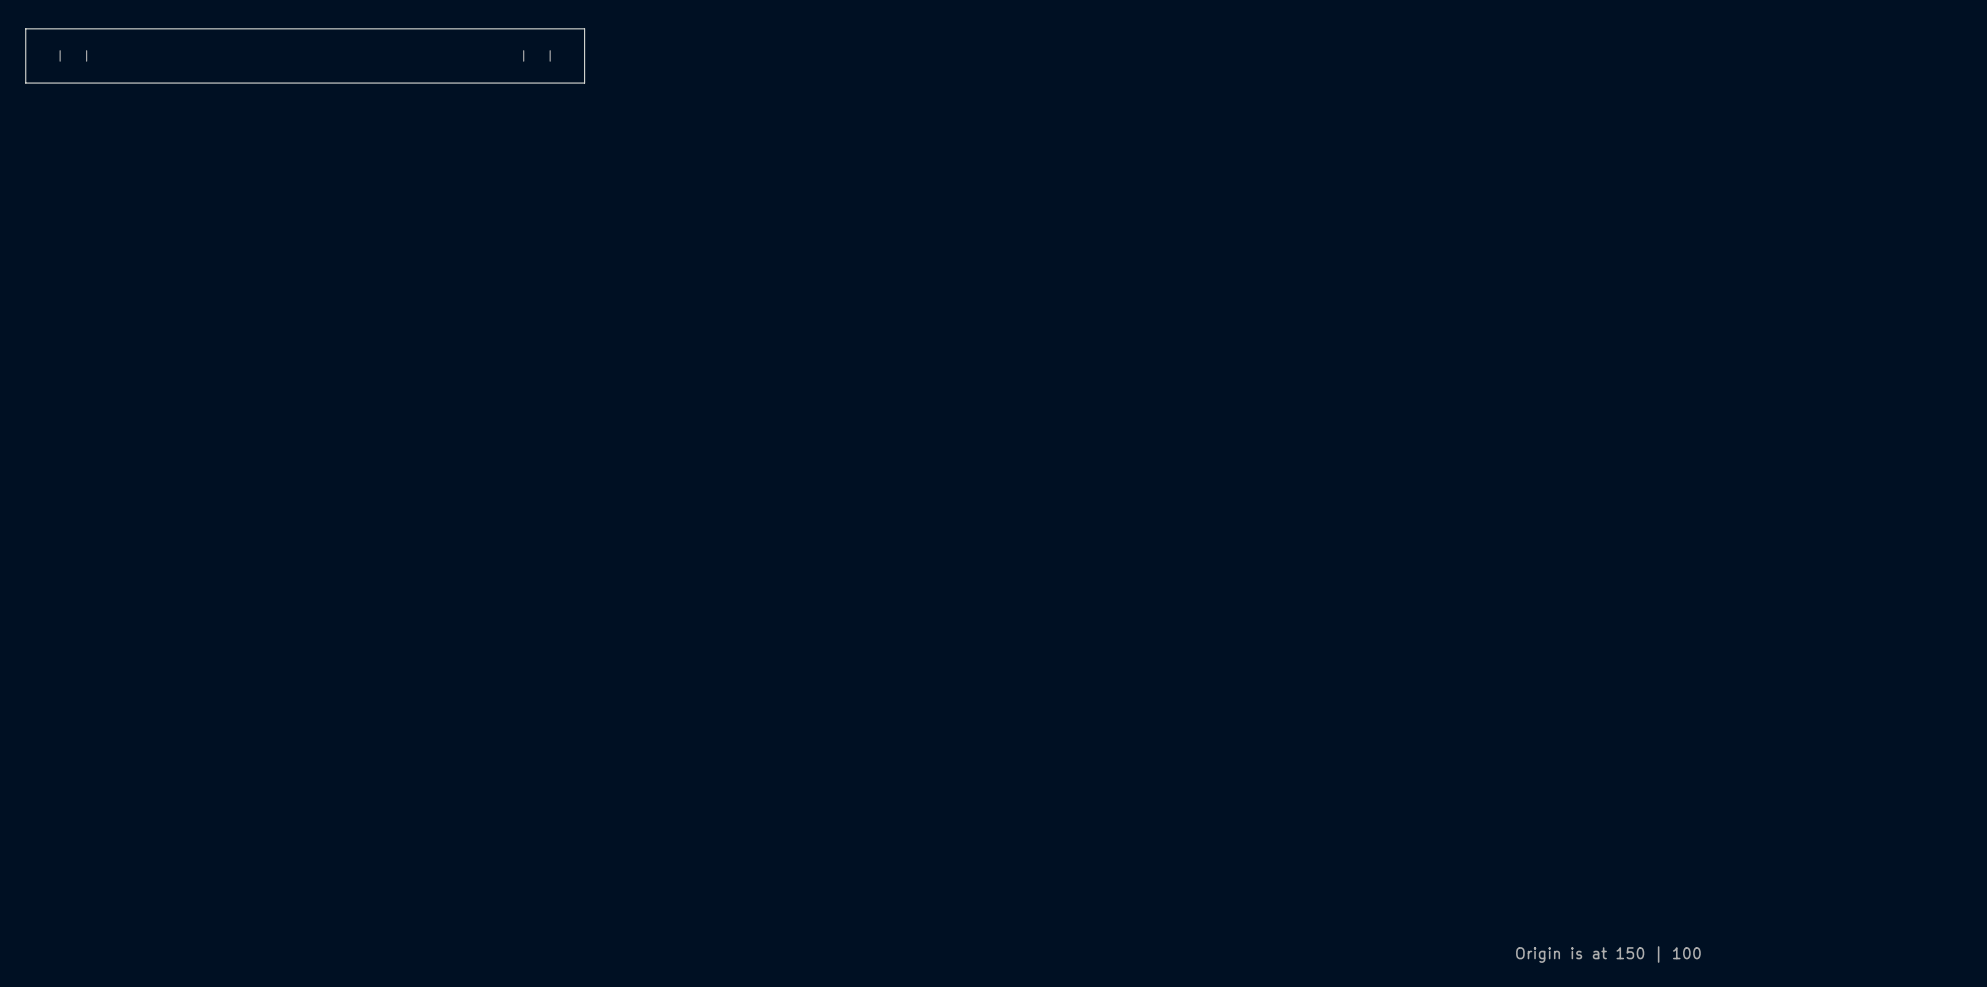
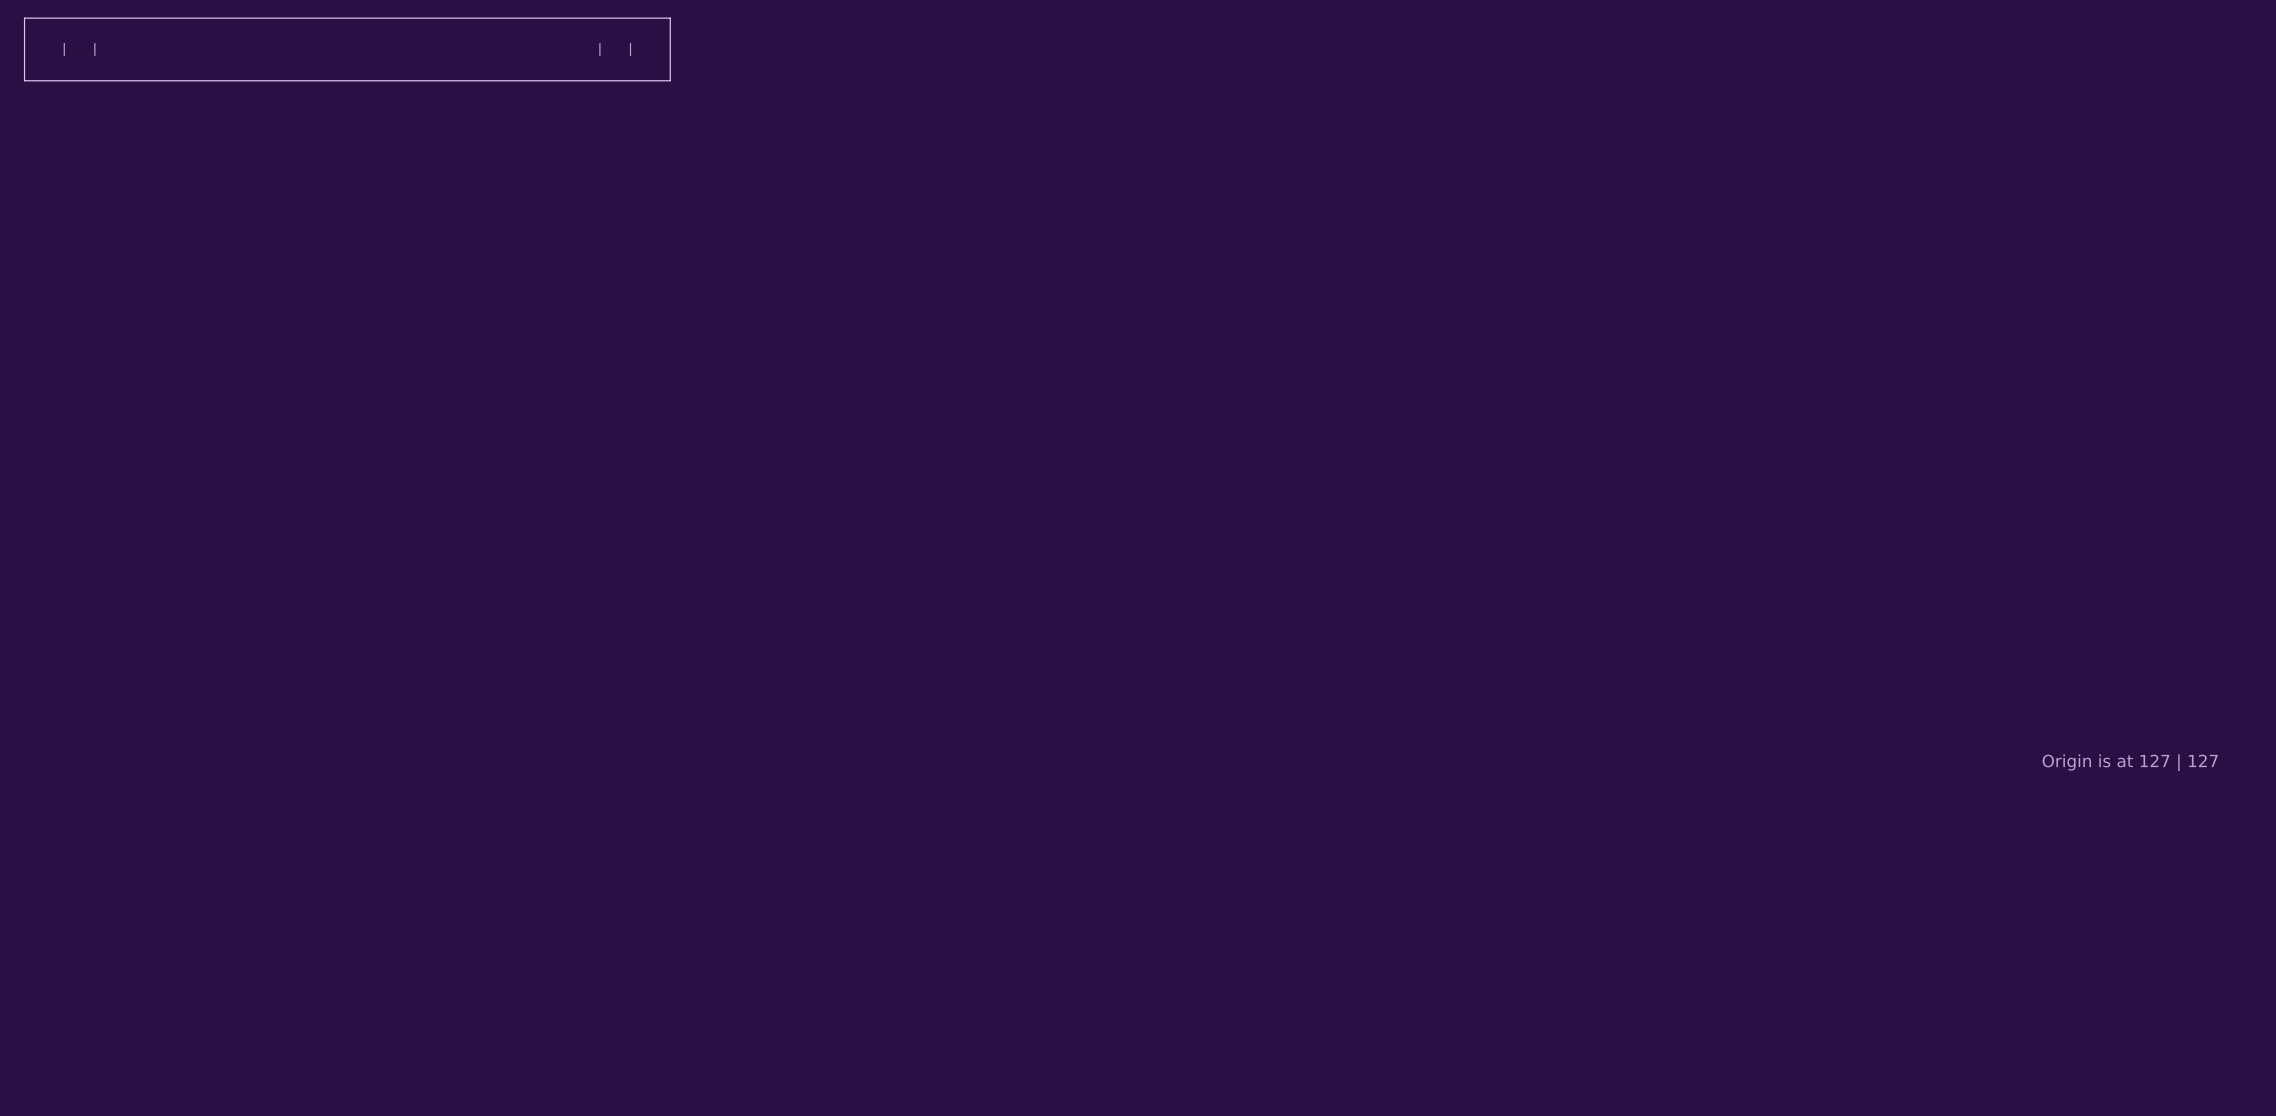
text: none -> Origin is at 127 | 127 (2130, 762)
text: Origin is at 150 | 100 (1608, 954) -> none

